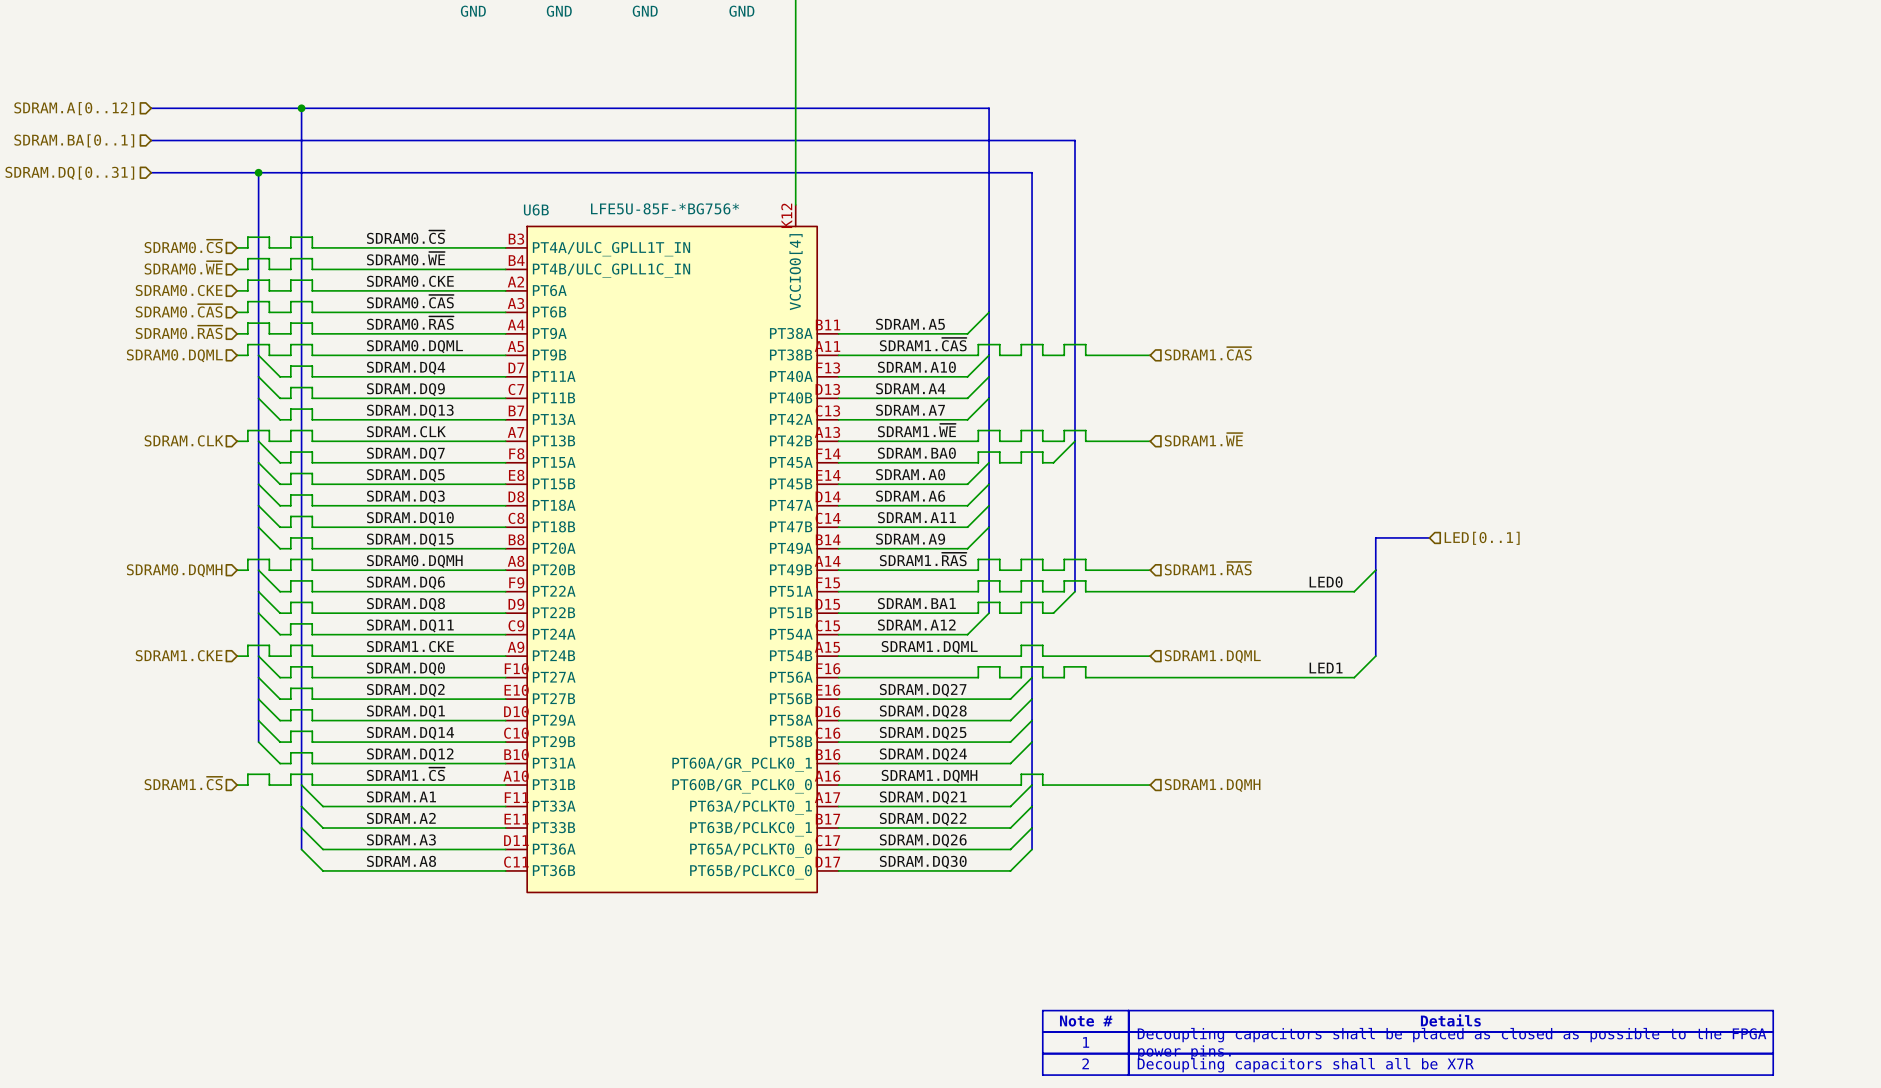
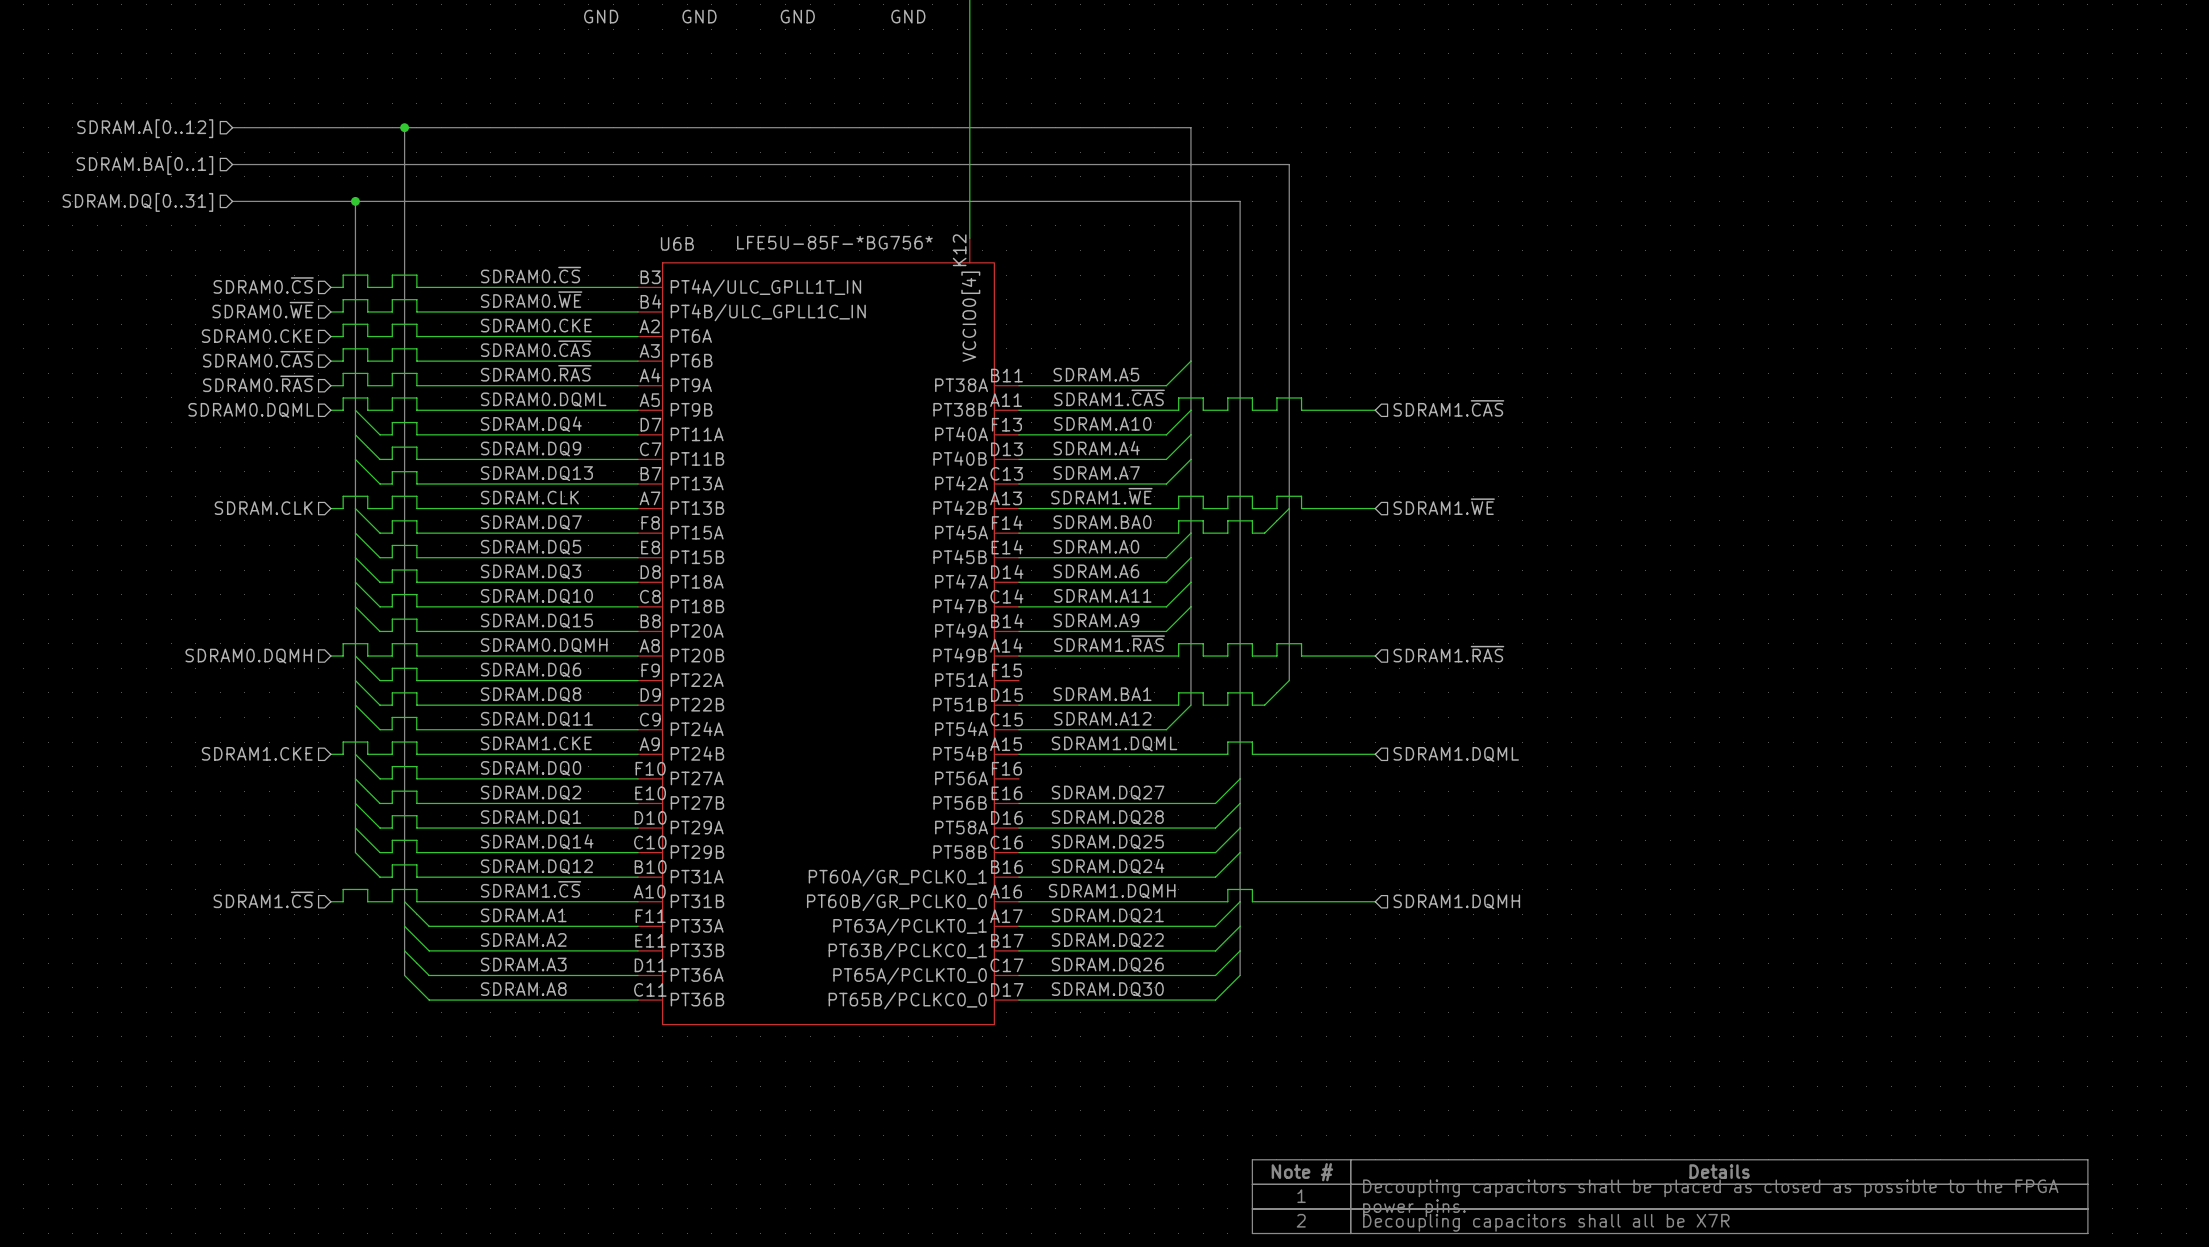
bus: (1429, 537) (1375, 537) (1375, 656) -> none
hierarchical label: LED[0..1] (1482, 538) -> none
wire: (1375, 570) (1354, 591) (1085, 591) (1085, 580) (1064, 580) (1064, 591) (1042, 591) (1042, 580) (1021, 580) (1021, 591) (999, 591) (999, 580) (978, 580) (978, 591) (838, 591) -> none
label: LED0 (1326, 582) -> none
wire: (1375, 656) (1354, 677) (1085, 677) (1085, 666) (1064, 666) (1064, 677) (1042, 677) (1042, 666) (1021, 666) (1021, 677) (999, 677) (999, 666) (978, 666) (978, 677) (838, 677) -> none
label: LED1 (1326, 668) -> none

